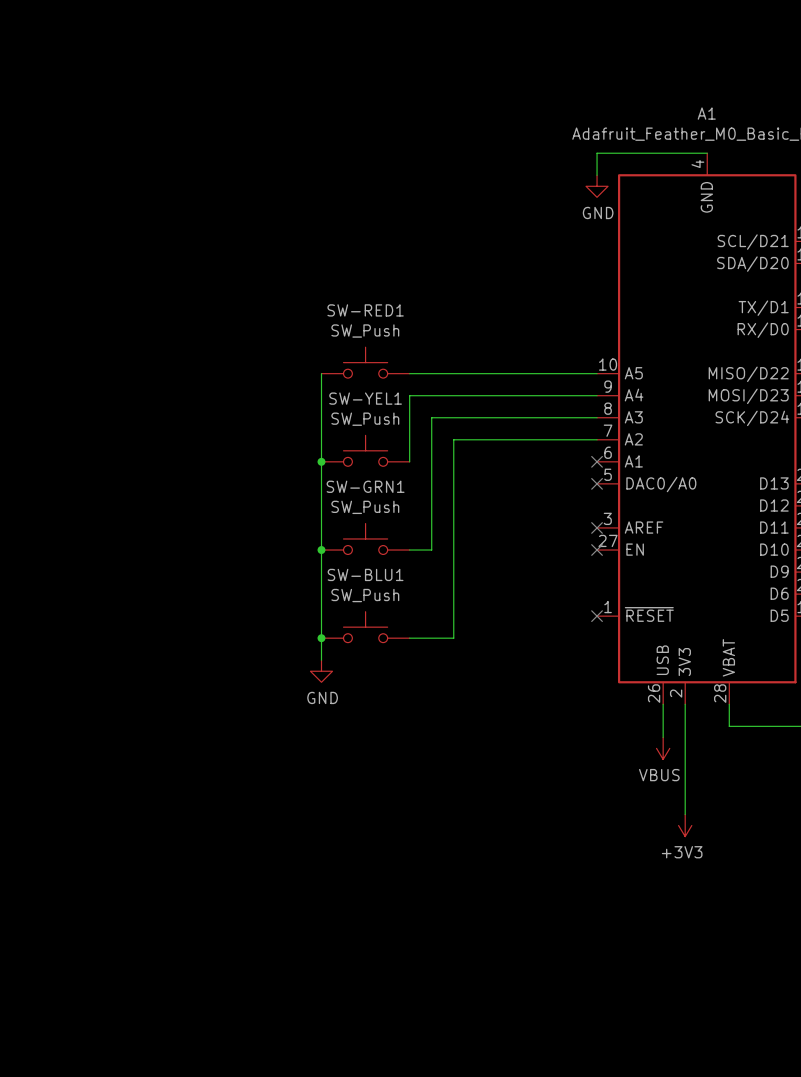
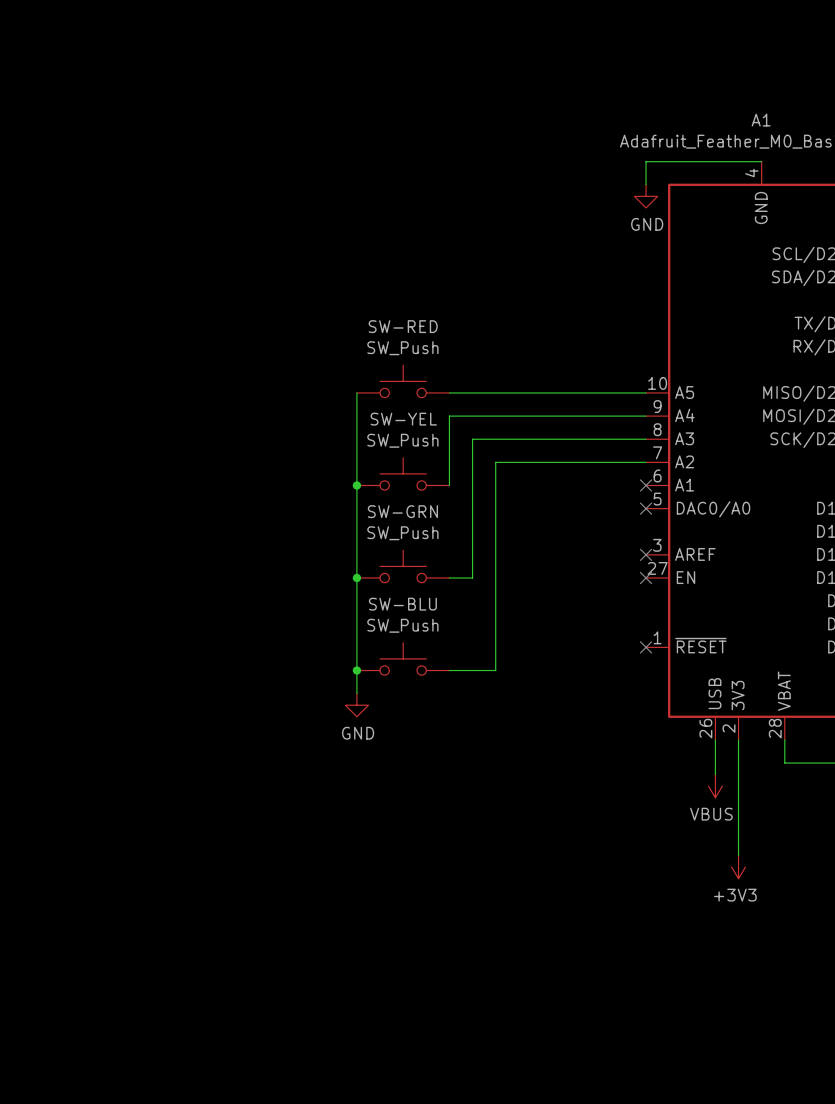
SW-RED1 name: SW-RED1 (365, 310) -> SW-RED (403, 326)
SW-YEL1 name: SW-YEL1 (365, 398) -> SW-YEL (403, 419)
SW-GRN1 name: SW-GRN1 (365, 486) -> SW-GRN (402, 511)
SW-BLU1 name: SW-BLU1 (365, 574) -> SW-BLU (402, 604)

